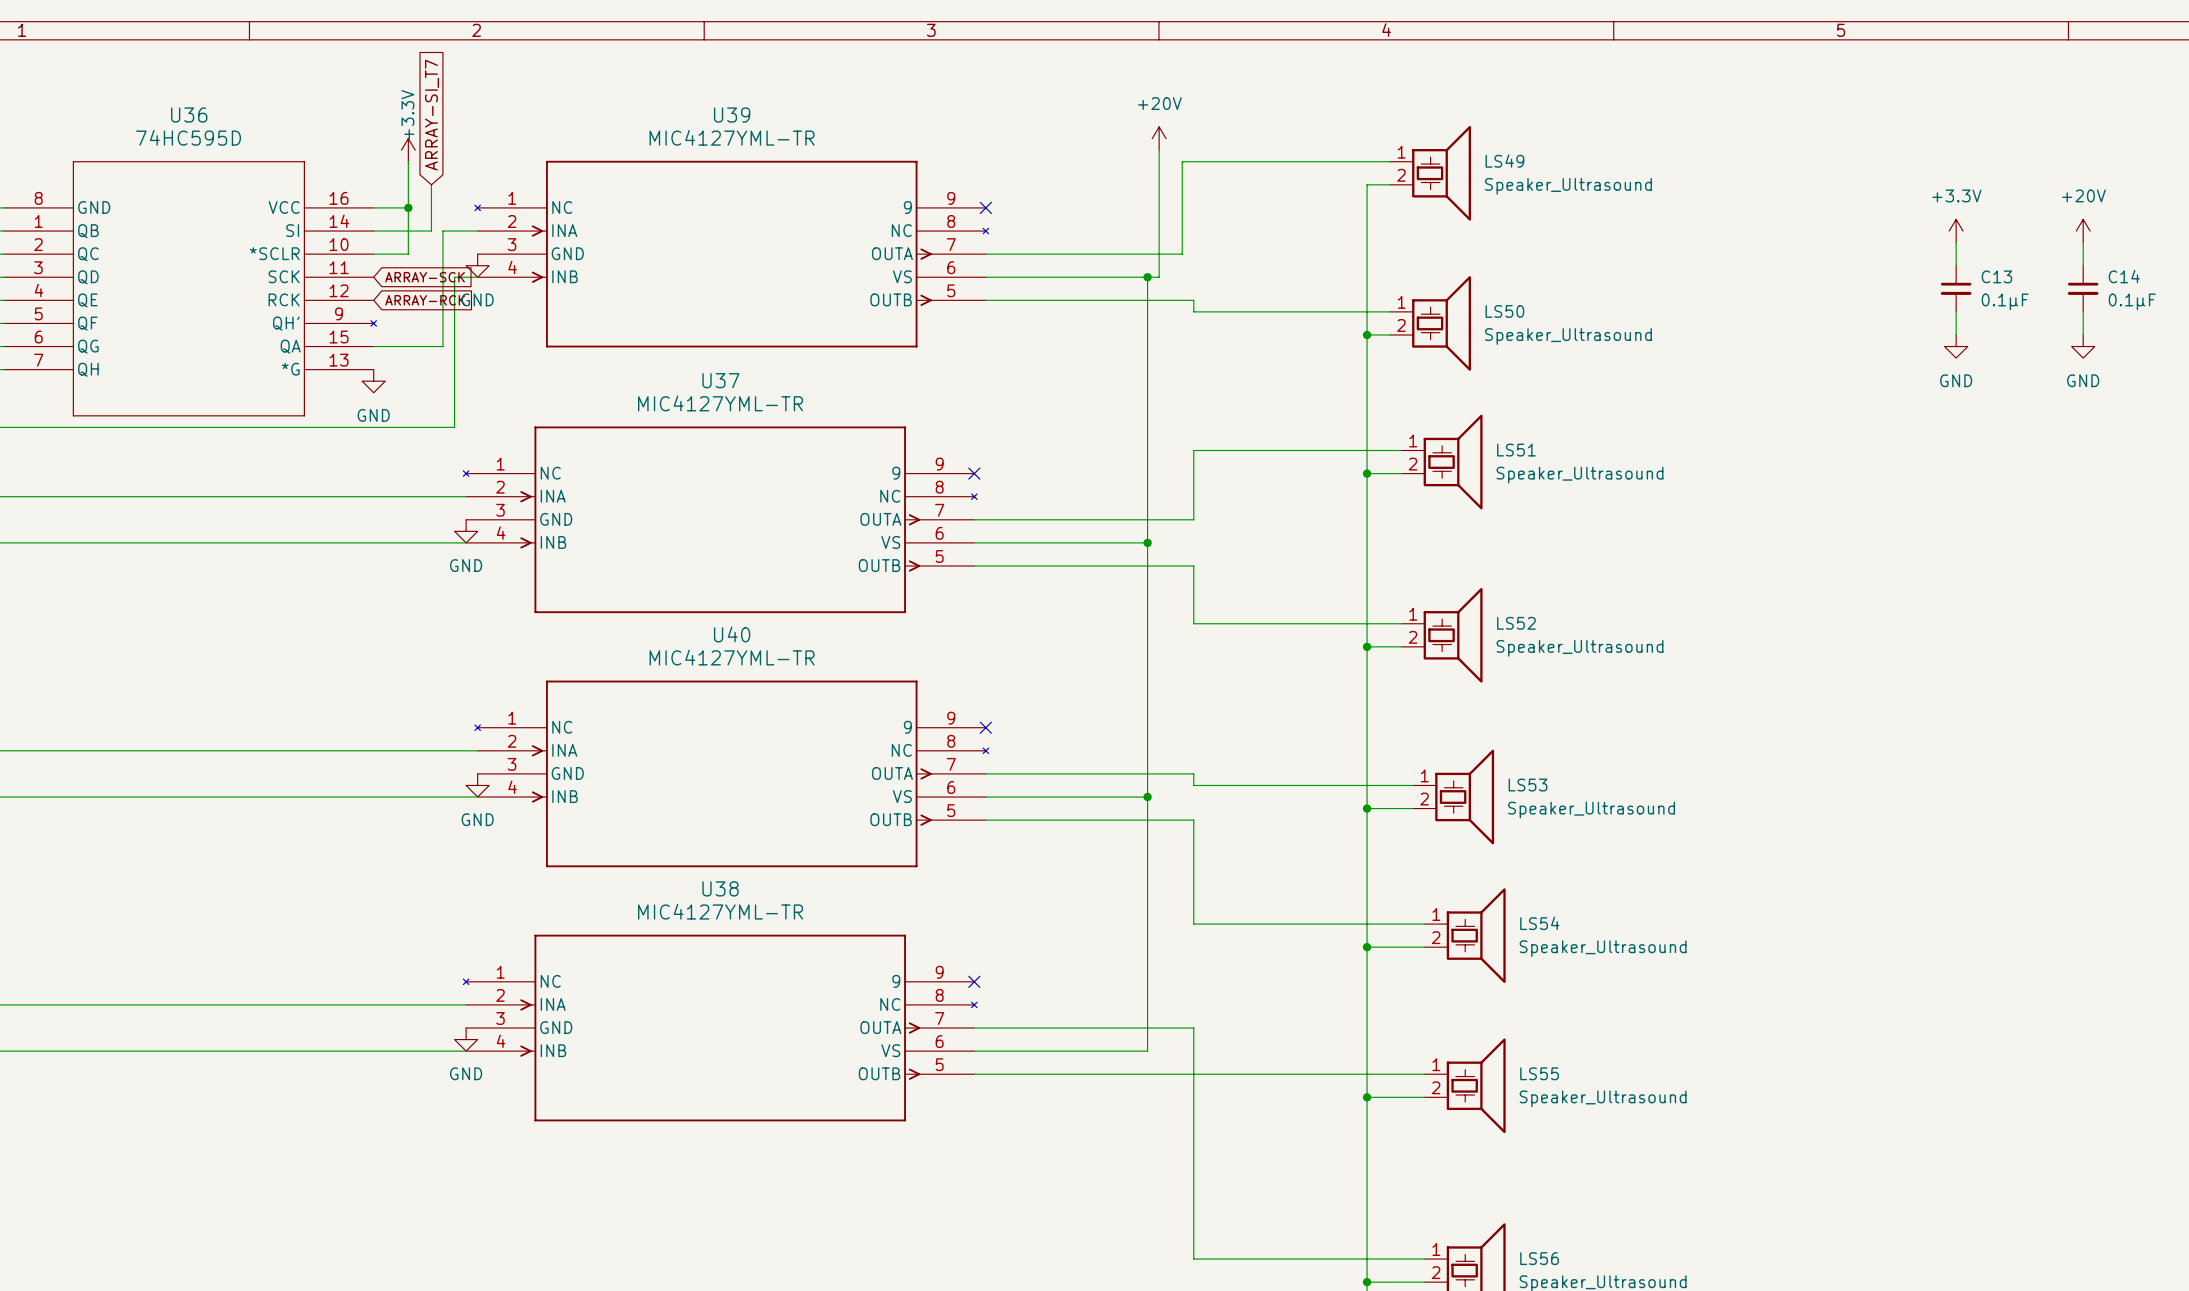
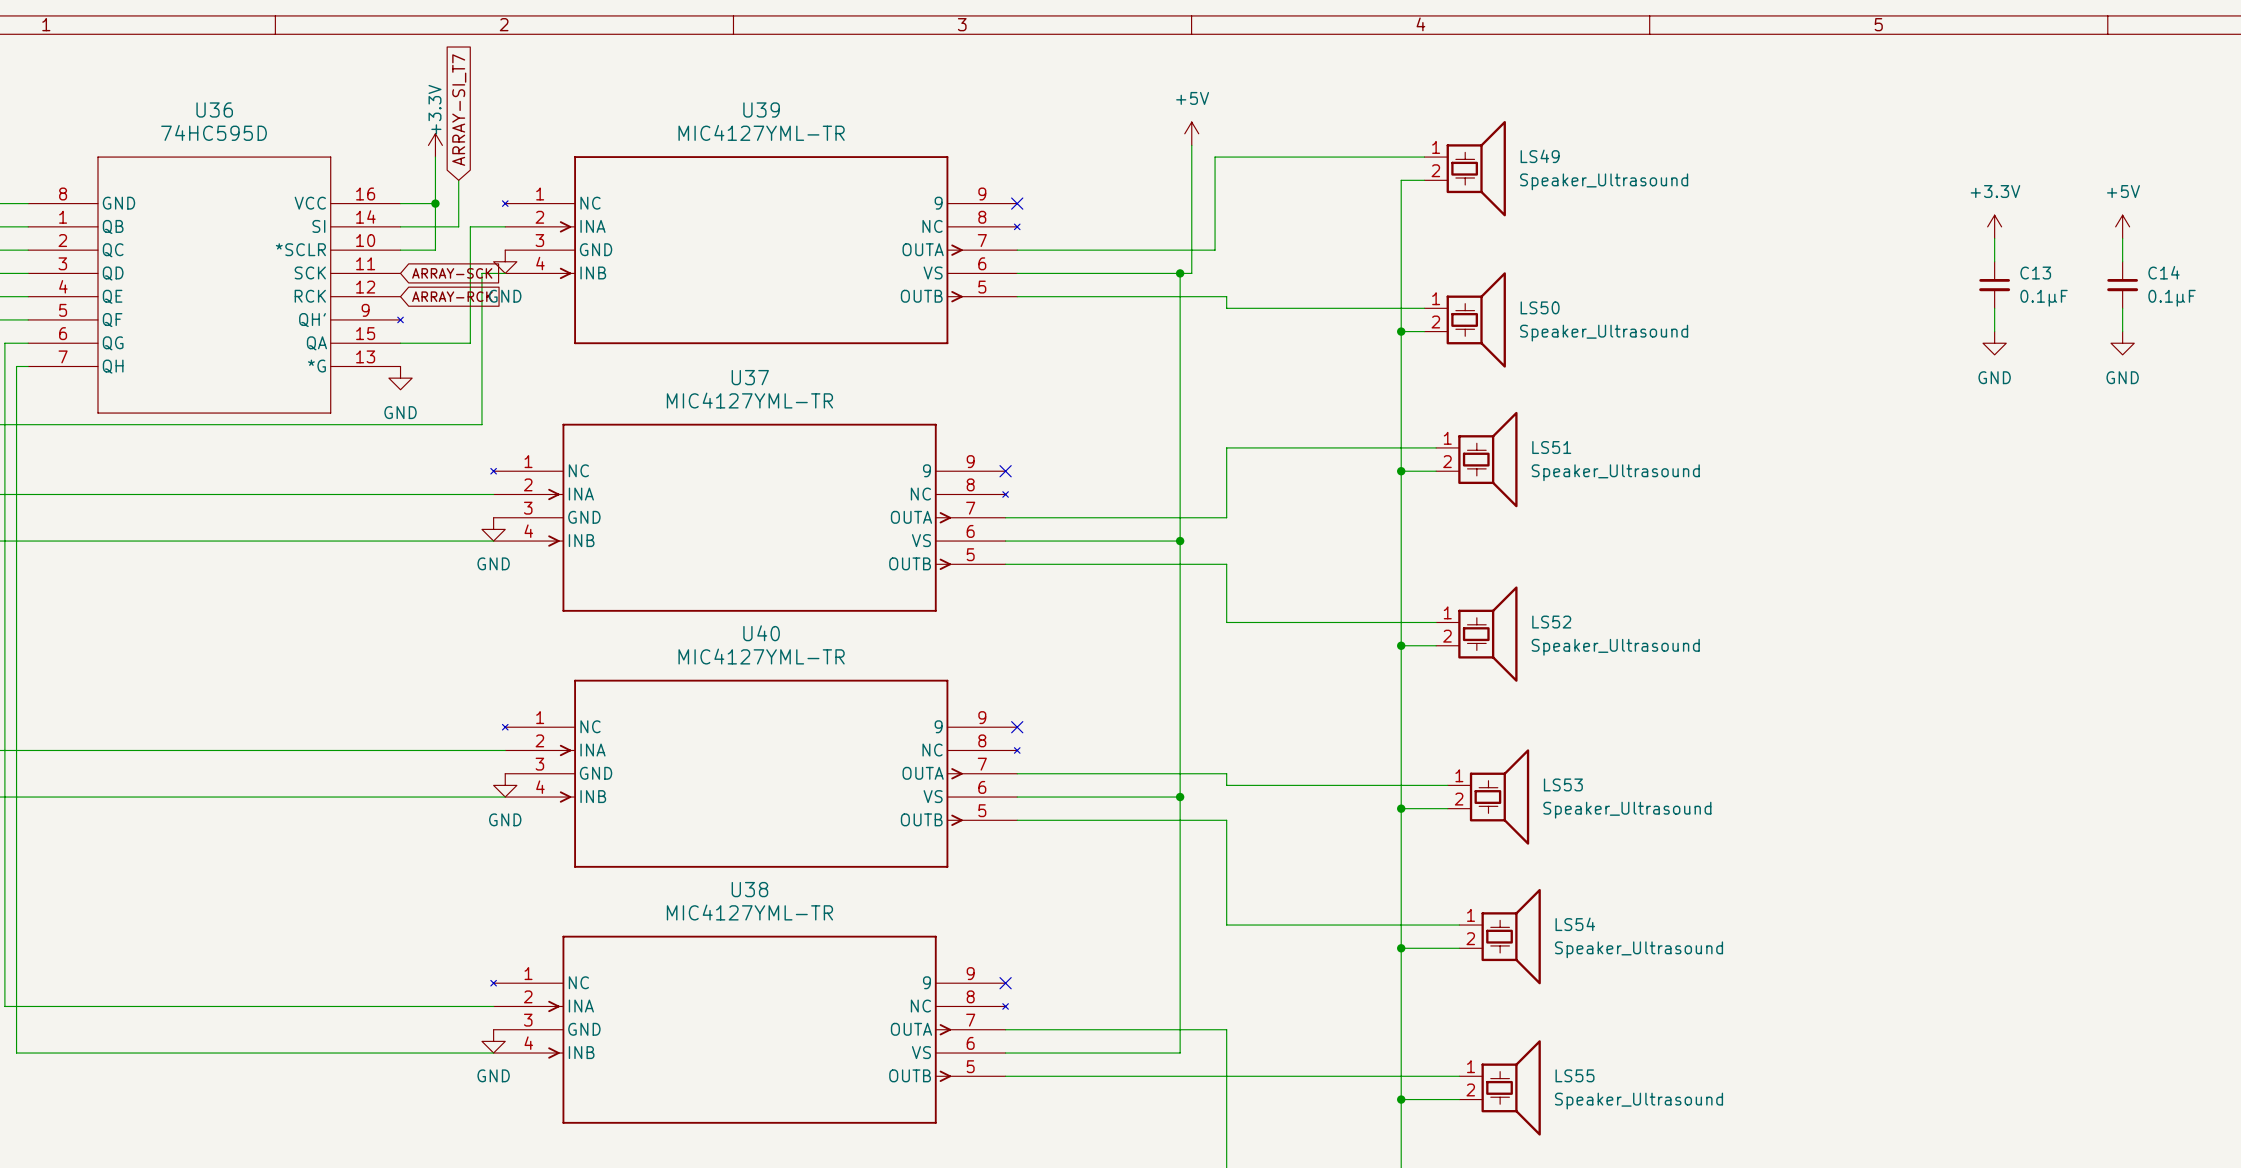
power symbol: +20V (1159, 138) -> +5V (1191, 133)
power symbol: +20V (2083, 231) -> +5V (2122, 226)

